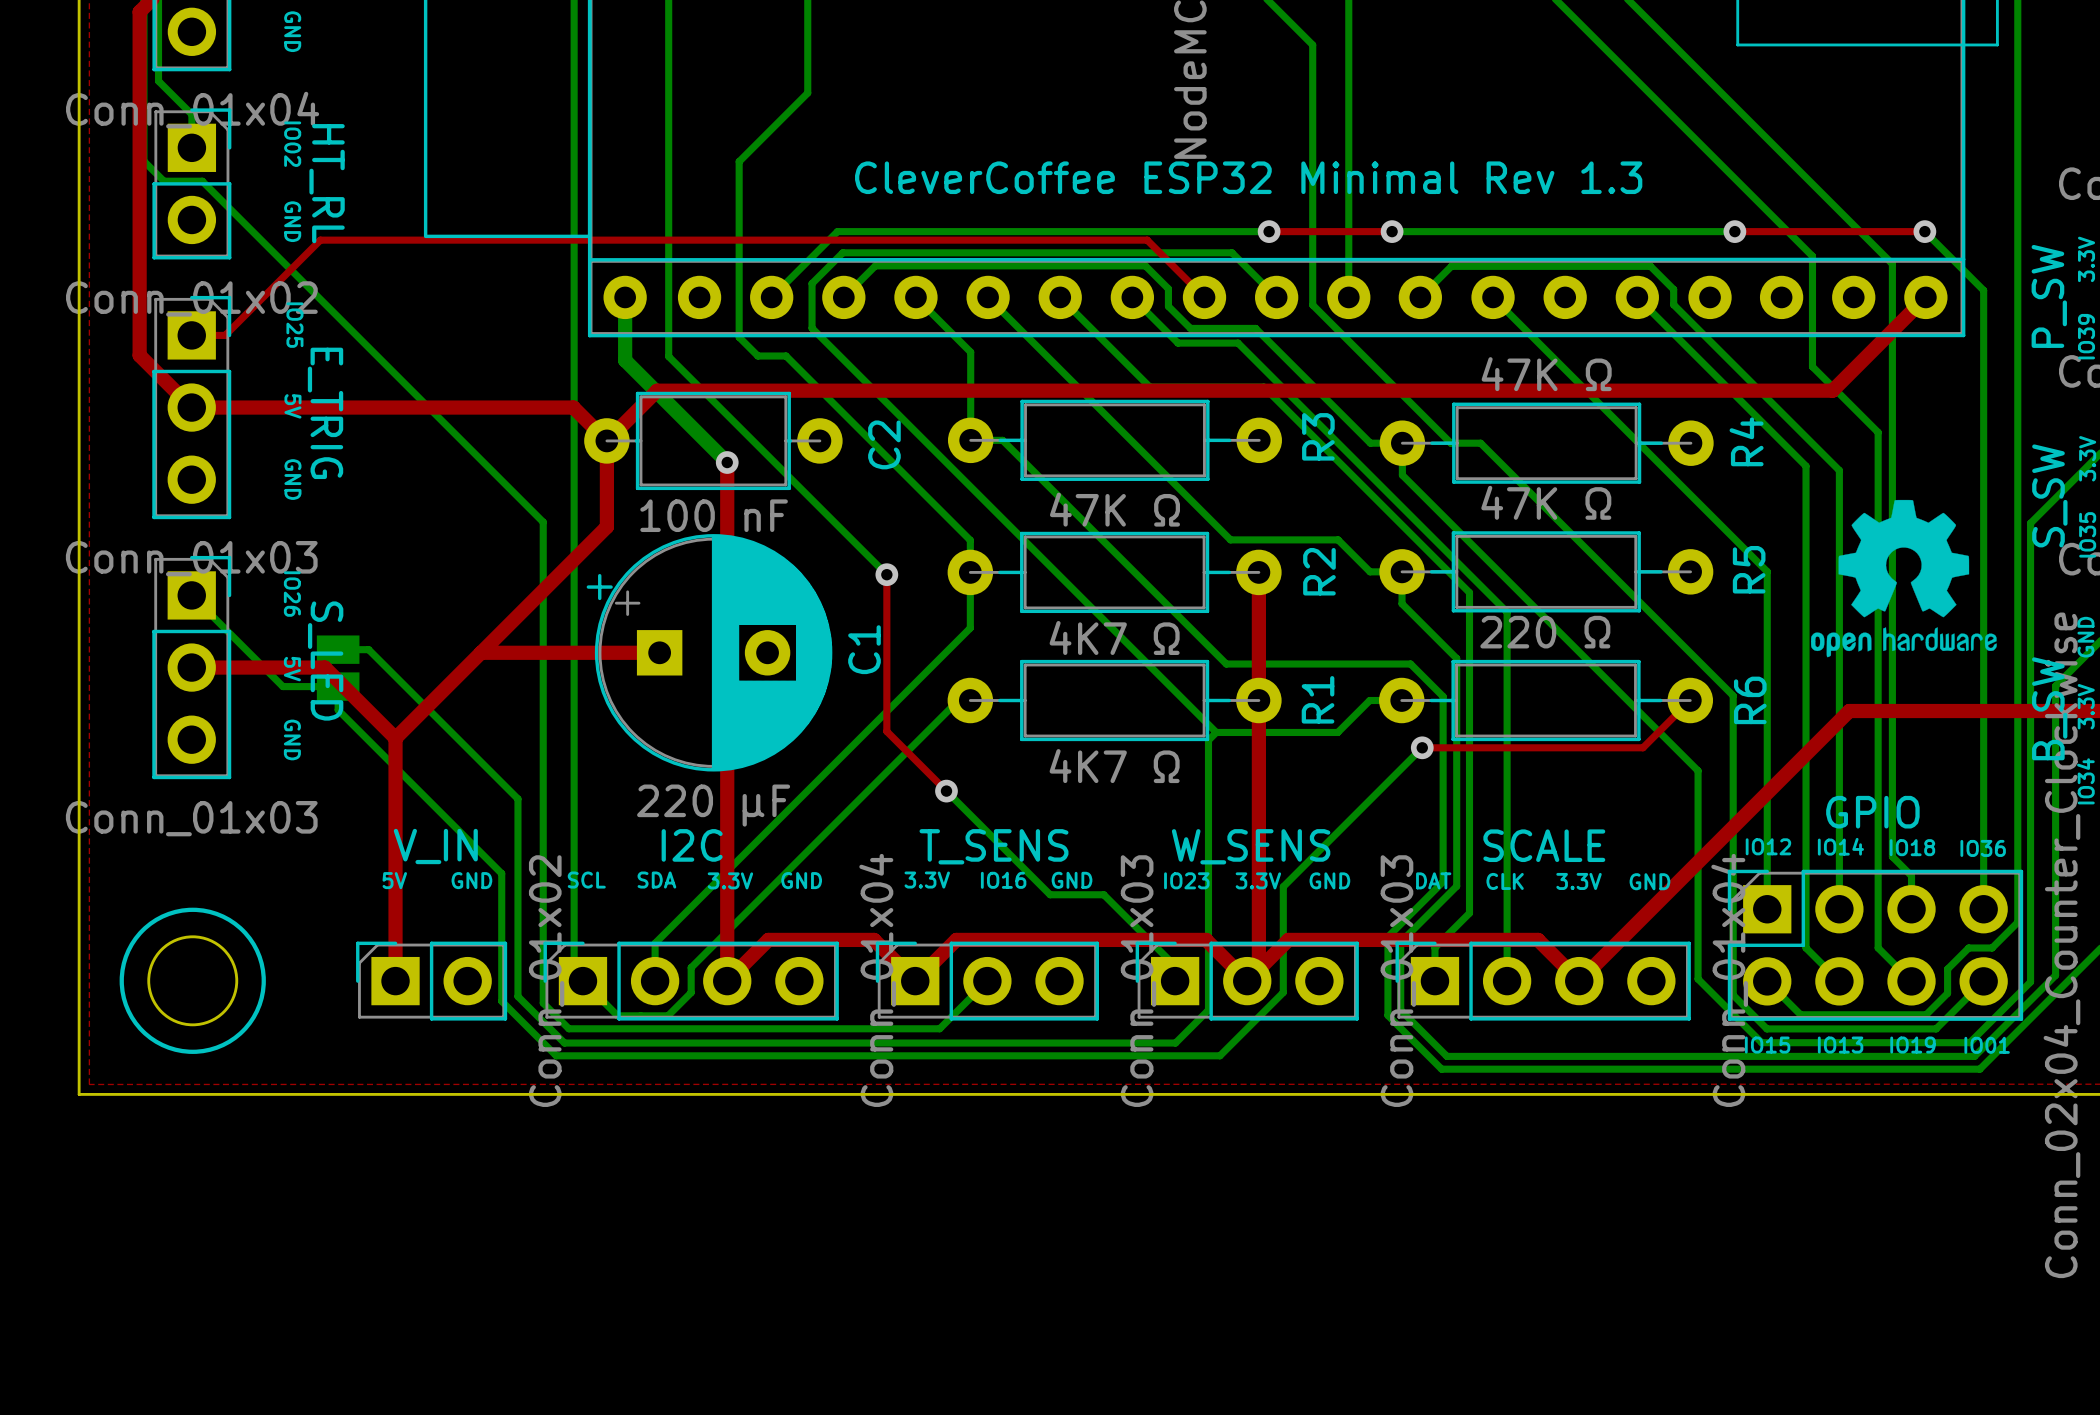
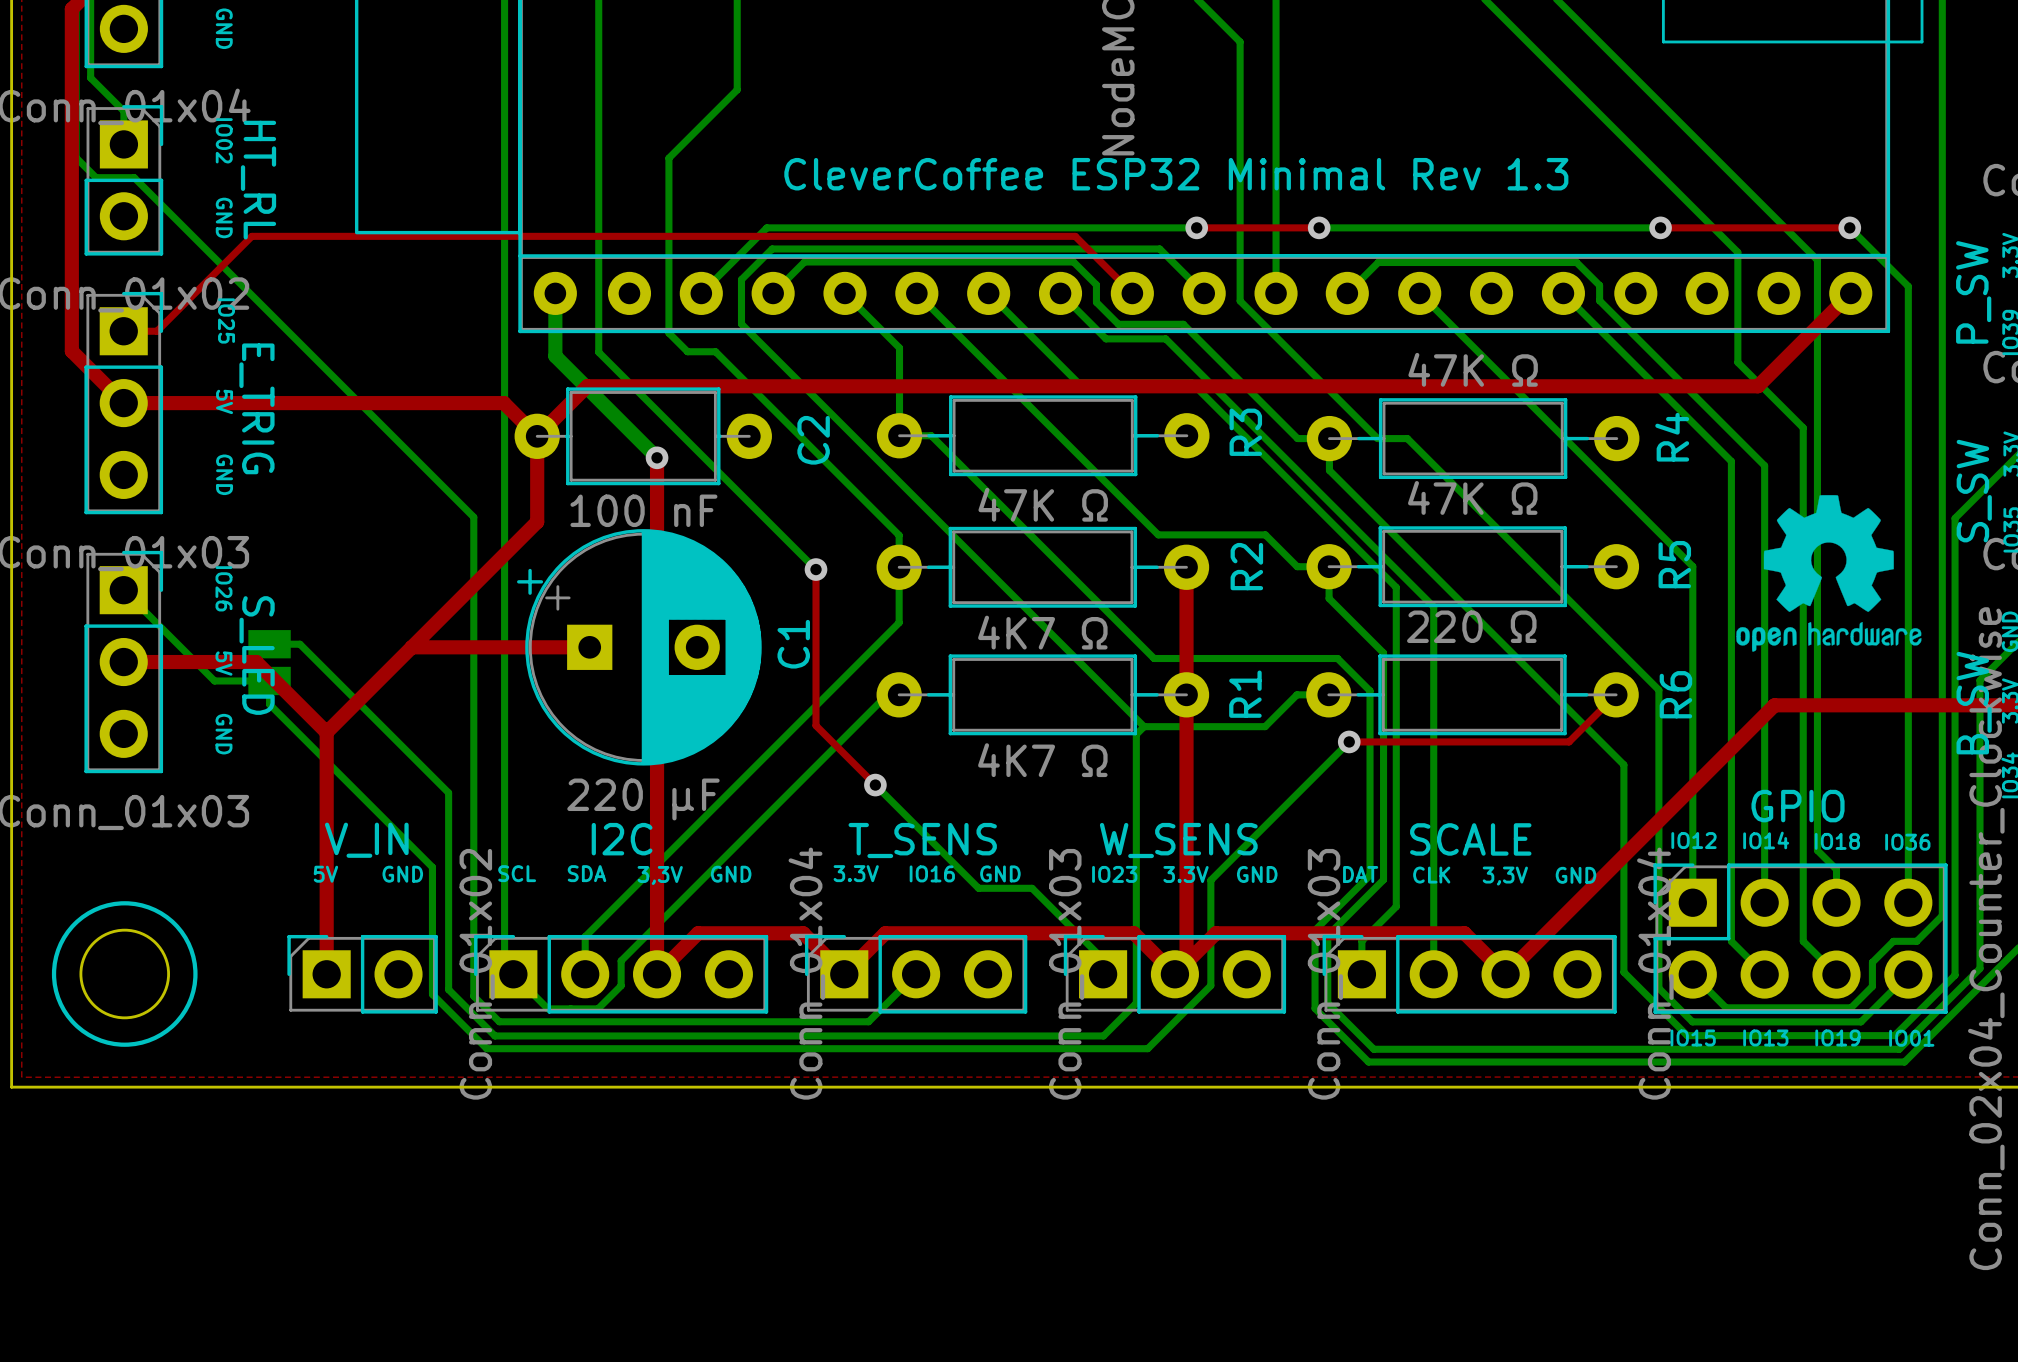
text: 3.3V (730, 880) -> 3,3V (660, 875)
text: 3.3V (1579, 881) -> 3,3V (1505, 876)

